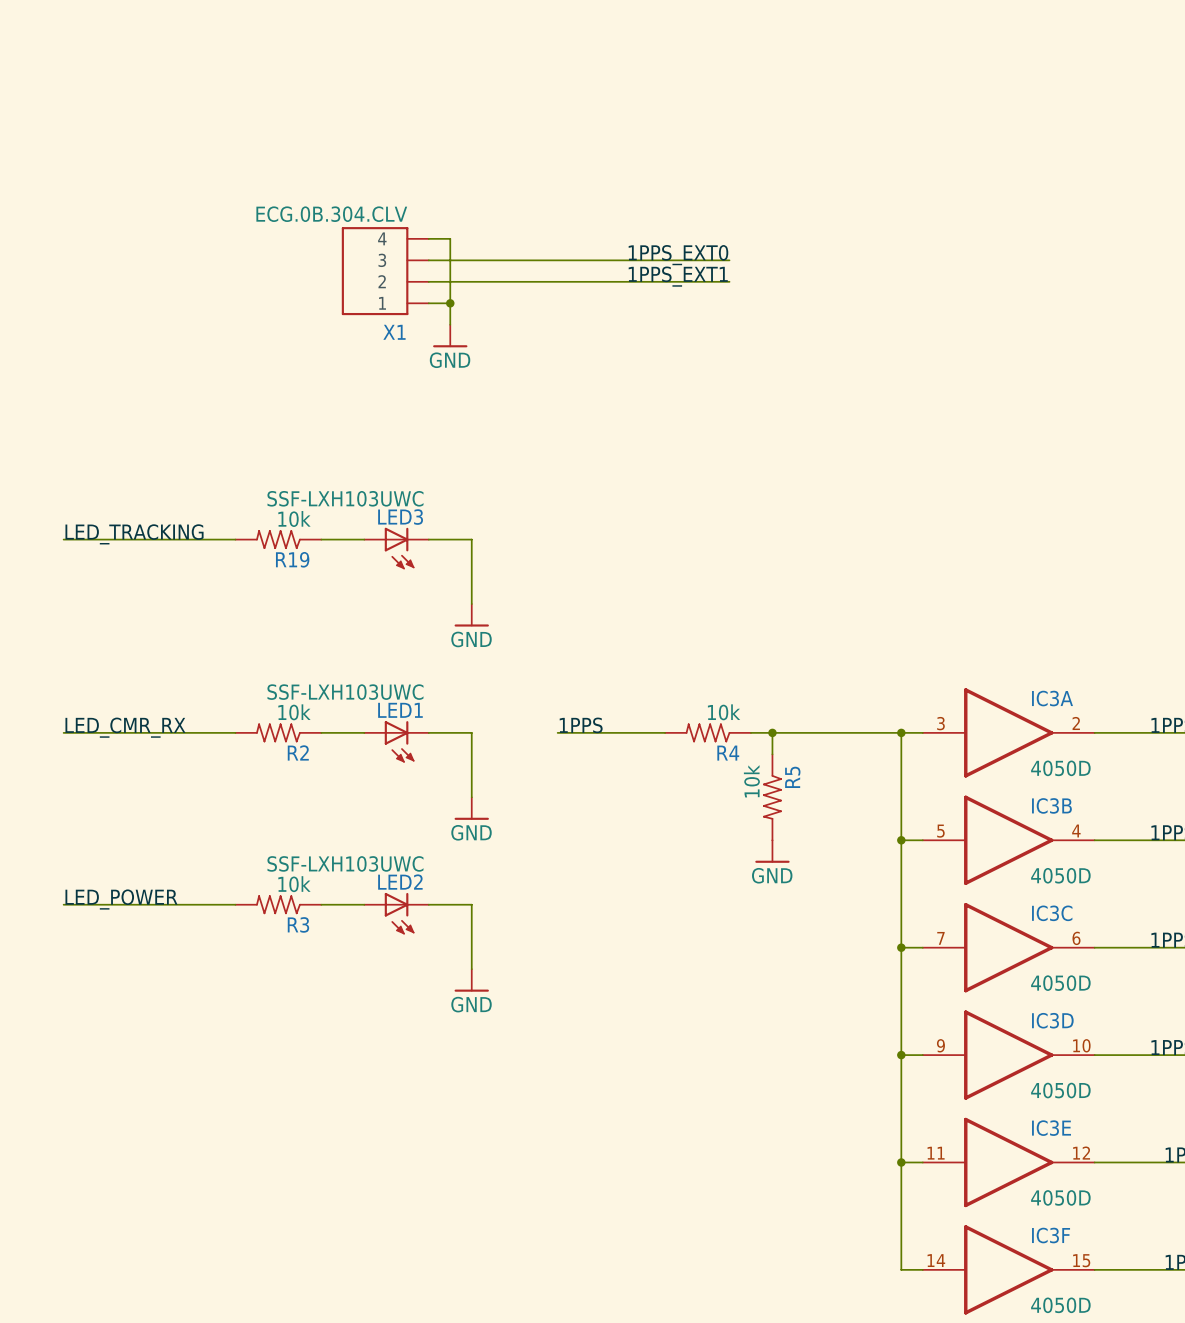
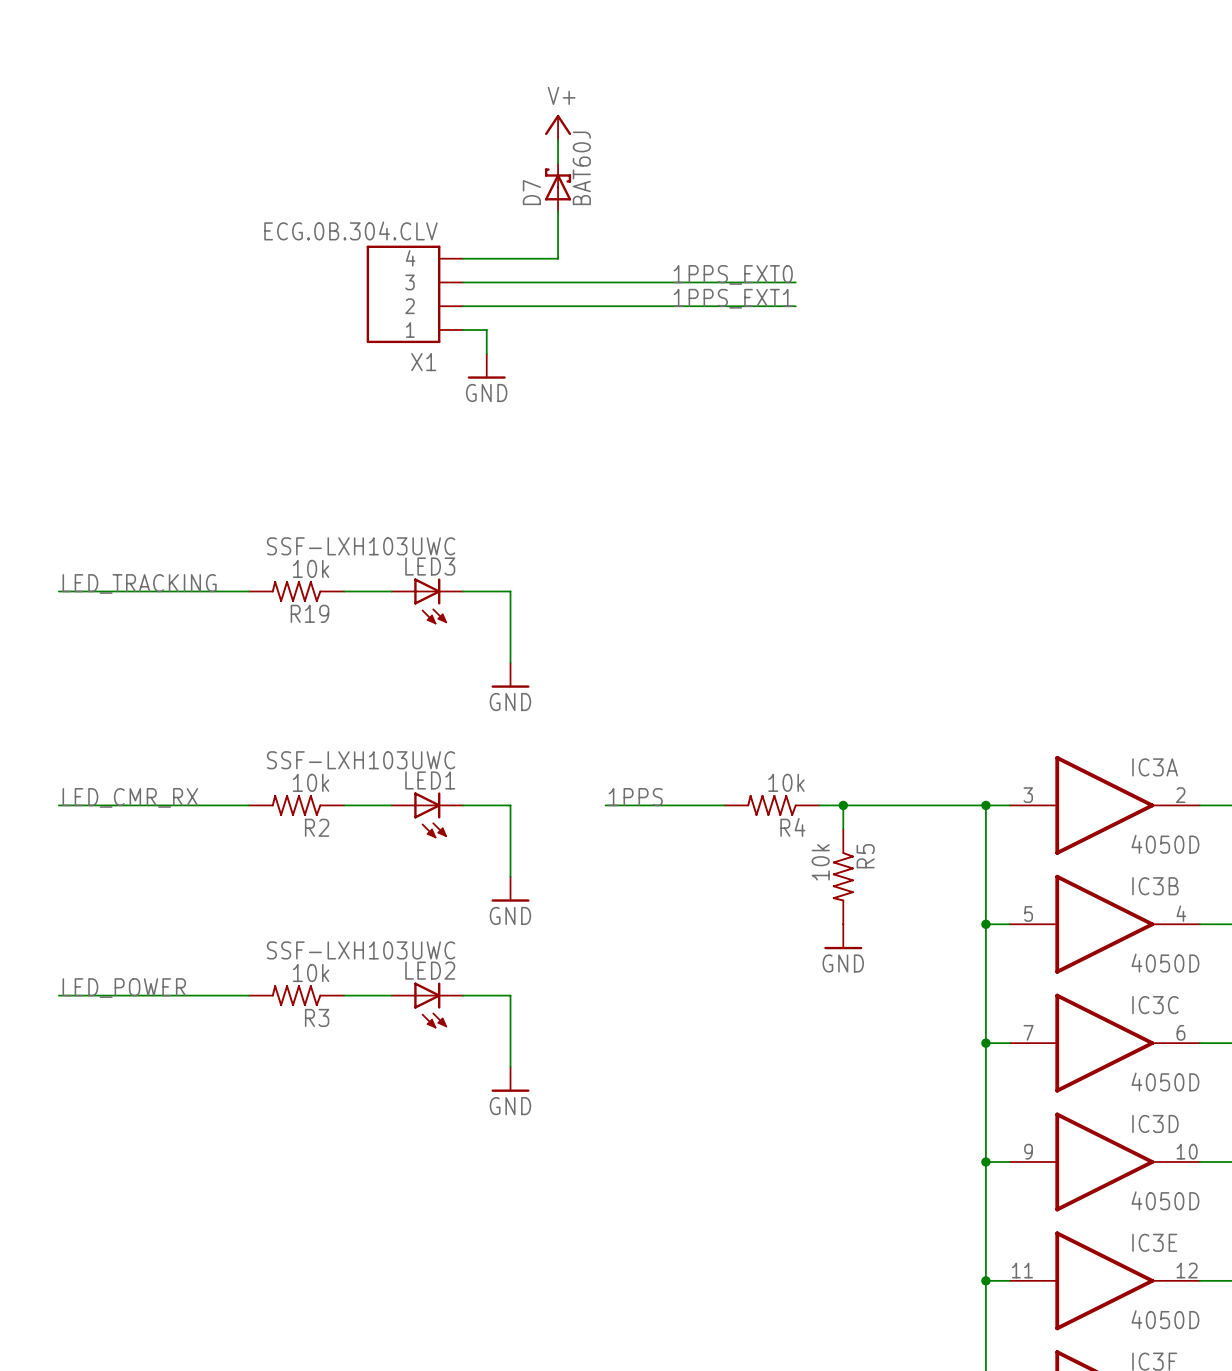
power symbol: none -> V+ (558, 127)
wire: none -> (558, 139) (558, 163)
D7: none -> BAT60J (558, 187)
wire: (450, 238) (450, 303) -> (486, 258) (558, 258) (558, 211)
junction: (450, 303) -> none

